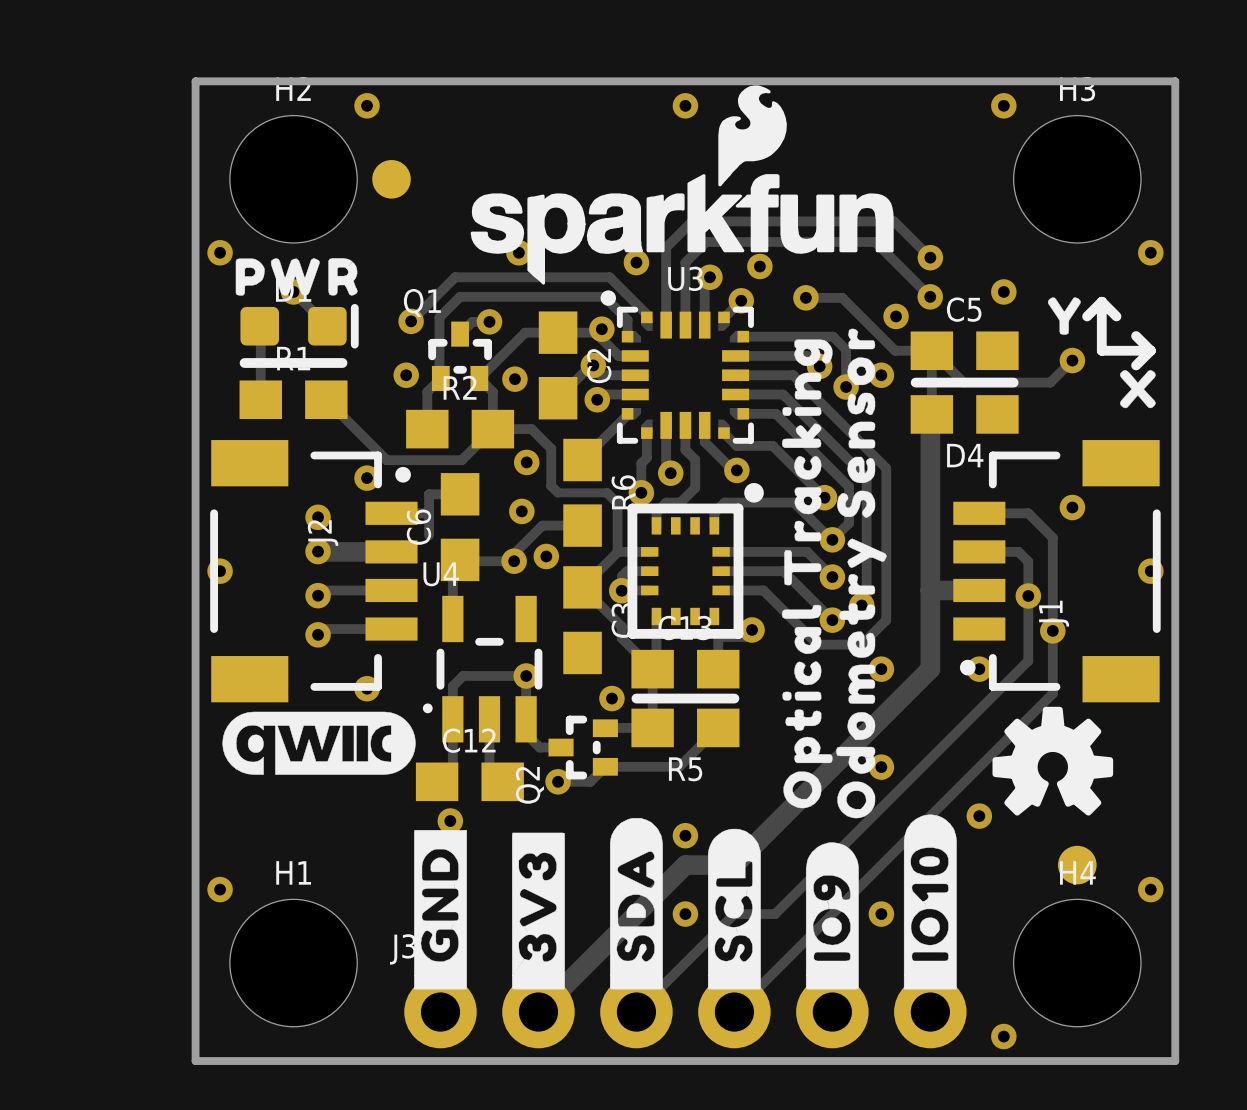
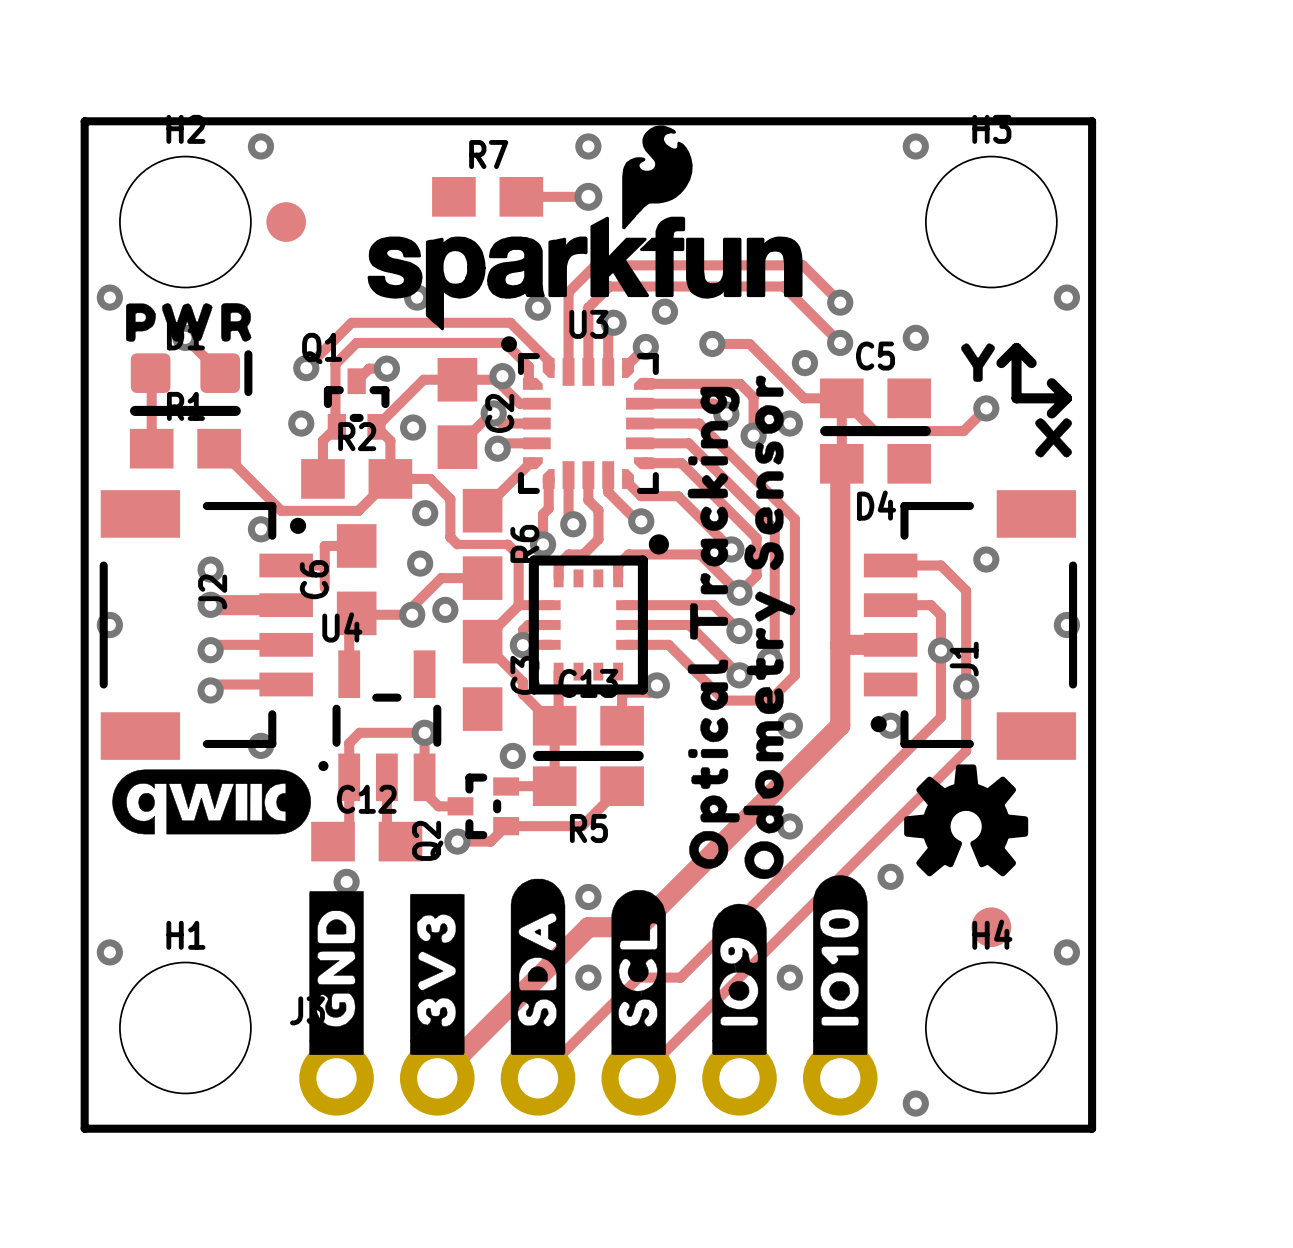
R7: none -> (487, 196)
track: none -> (521, 196) (588, 196)
via: none -> (588, 196)

